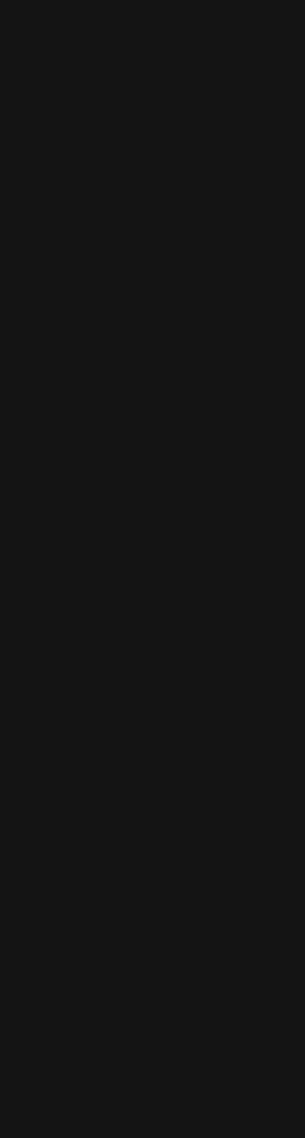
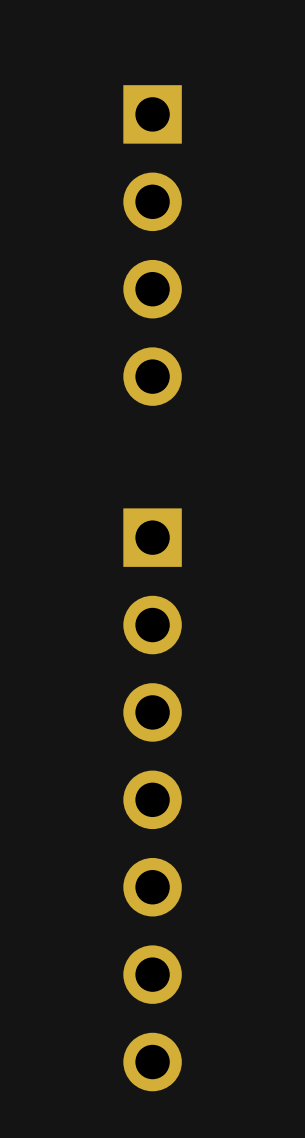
part: none -> (152, 245)
part: none -> (152, 799)

